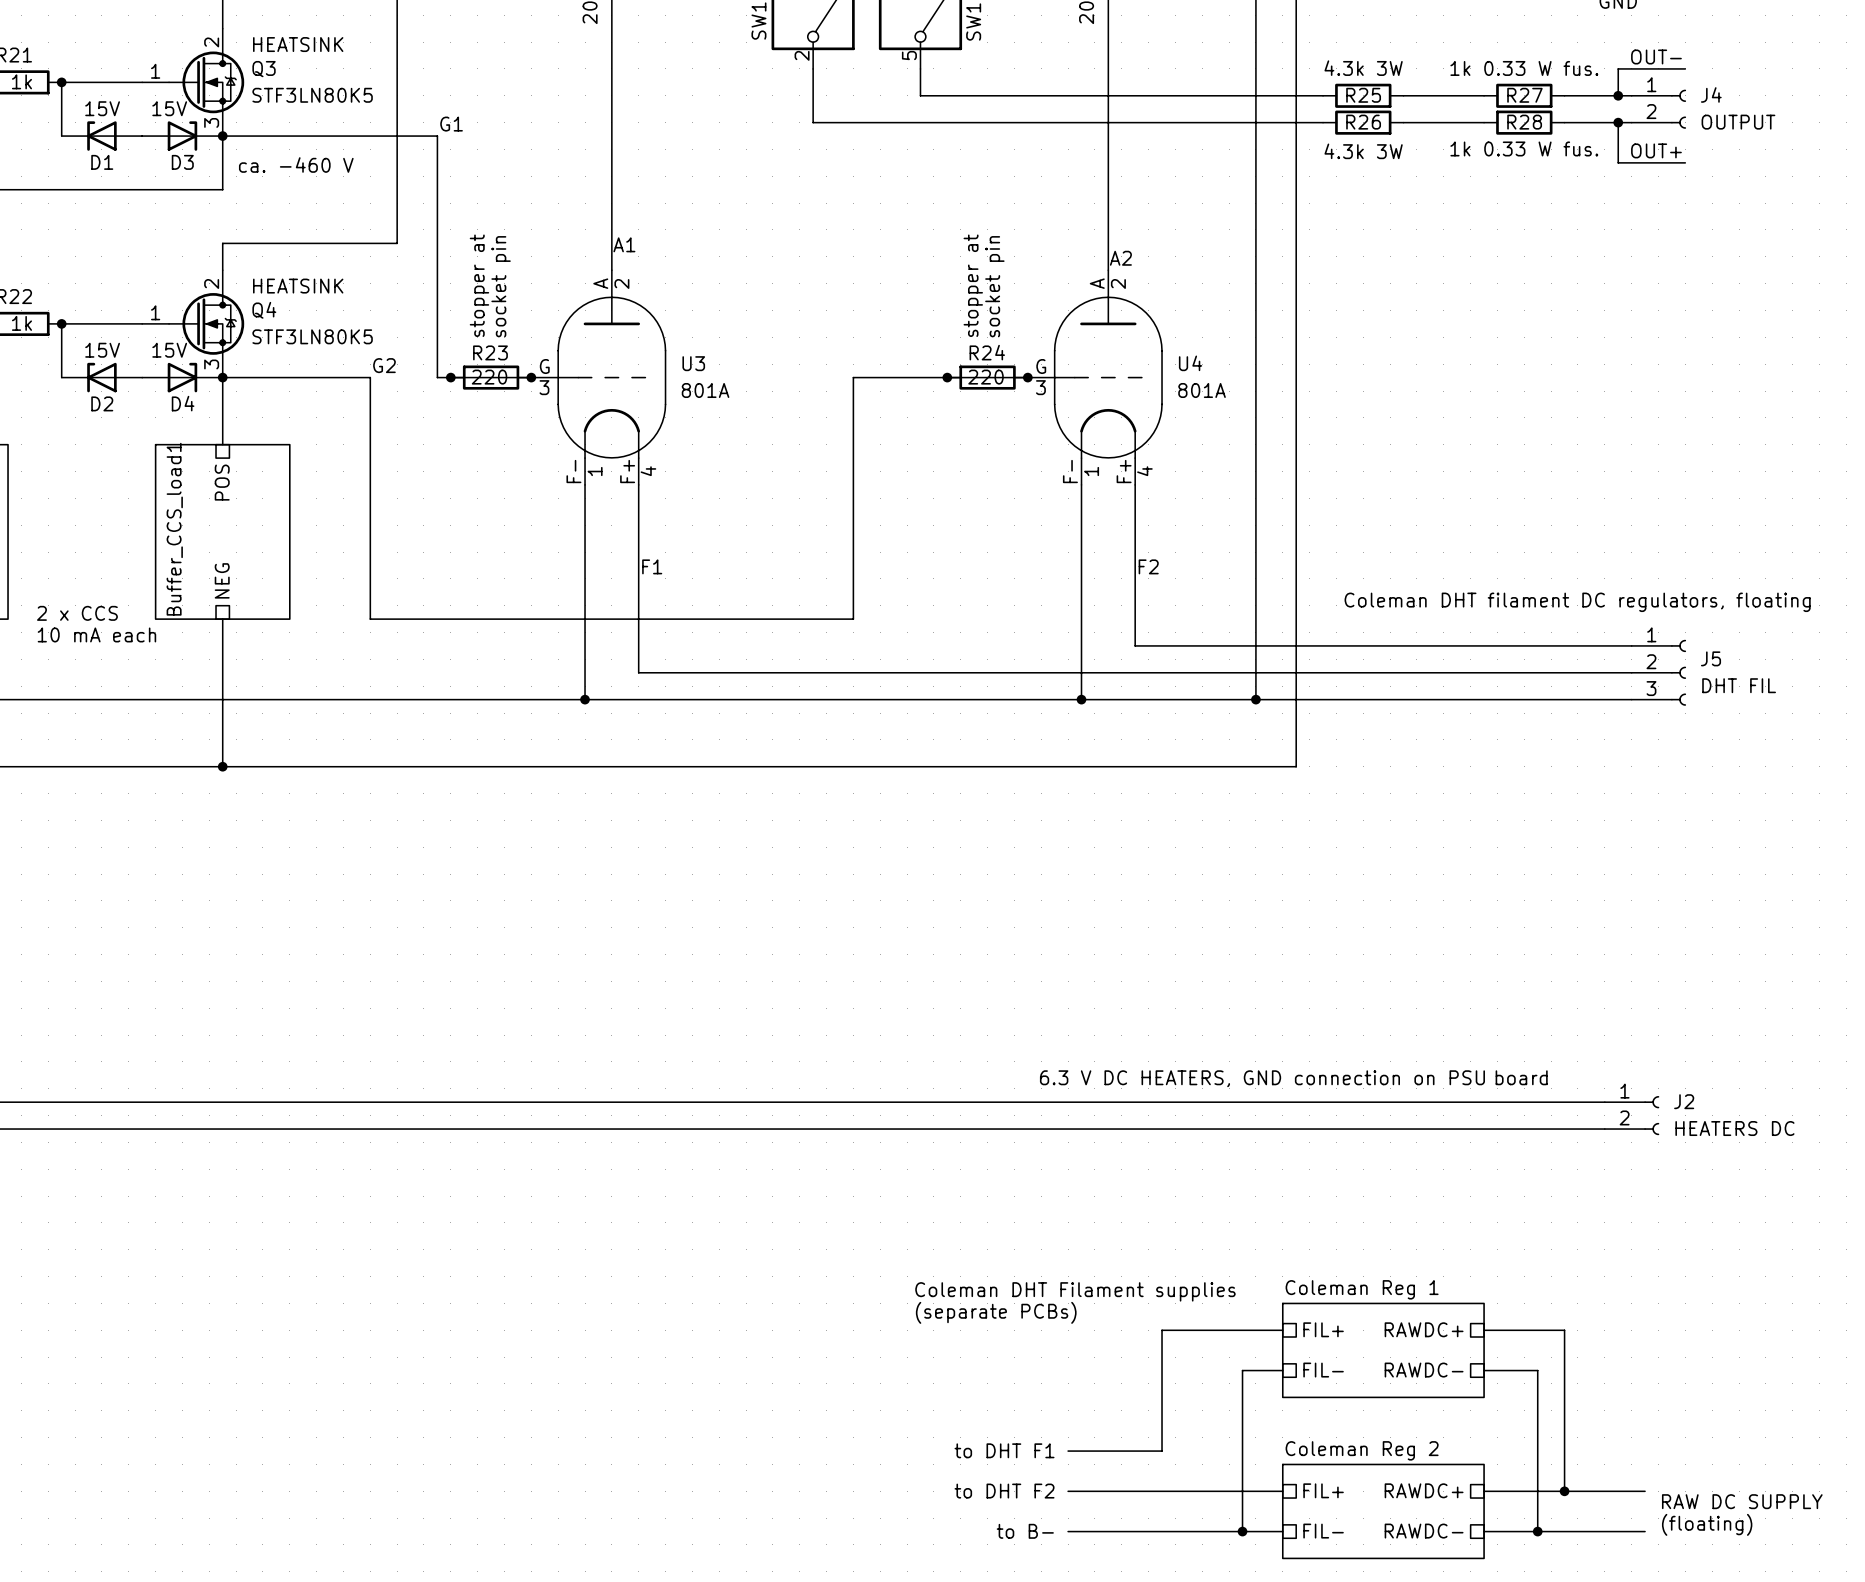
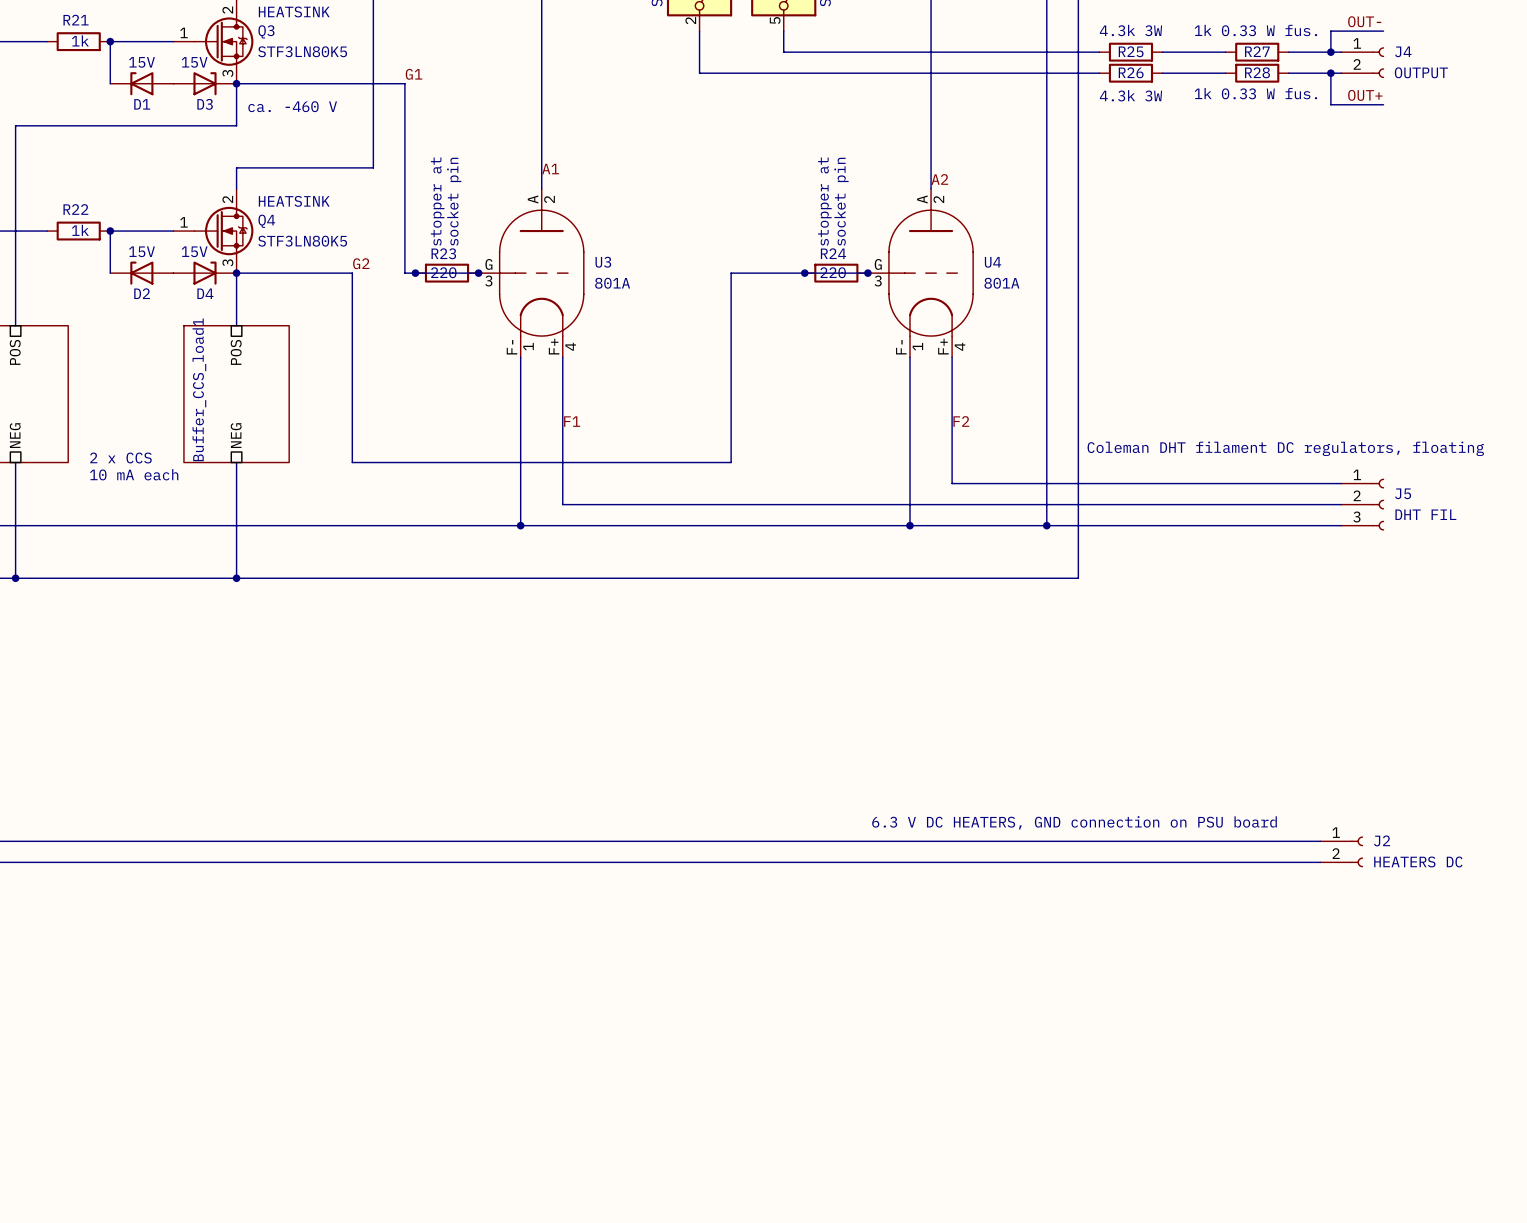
text: Coleman DHT Filament supplies (1075, 1291) -> none
text: (separate PCBs) (996, 1312) -> none
sheet pin: FIL+ (1323, 1329) -> none
sheet pin: RAWDC+ (1424, 1329) -> none
wire: (1282, 1330) (1162, 1330) (1162, 1451) (1068, 1451) -> none
wire: (1484, 1330) (1564, 1330) (1564, 1491) -> none
sheet Coleman Reg 1: (1383, 1350) -> none
wire: (1282, 1370) (1242, 1370) (1242, 1531) -> none
sheet pin: FIL- (1323, 1370) -> none
sheet pin: RAWDC- (1424, 1370) -> none
wire: (1484, 1370) (1537, 1370) (1537, 1531) -> none
text: to DHT F1 (1004, 1450) -> none
sheet pin: FIL+ (1323, 1490) -> none
sheet pin: RAWDC+ (1424, 1490) -> none
text: to DHT F2 (1004, 1491) -> none
wire: (1068, 1491) (1282, 1491) -> none
wire: (1484, 1491) (1645, 1491) -> none
junction: (1564, 1491) -> none
text: RAW DC SUPPLY (1742, 1501) -> none
sheet Coleman Reg 2: (1383, 1511) -> none
text: (floating) (1707, 1524) -> none
text: to B- (1025, 1531) -> none
wire: (1068, 1531) (1282, 1531) -> none
junction: (1242, 1531) -> none
sheet pin: FIL- (1323, 1531) -> none
sheet pin: RAWDC- (1424, 1531) -> none
wire: (1484, 1531) (1645, 1531) -> none
junction: (1537, 1531) -> none

